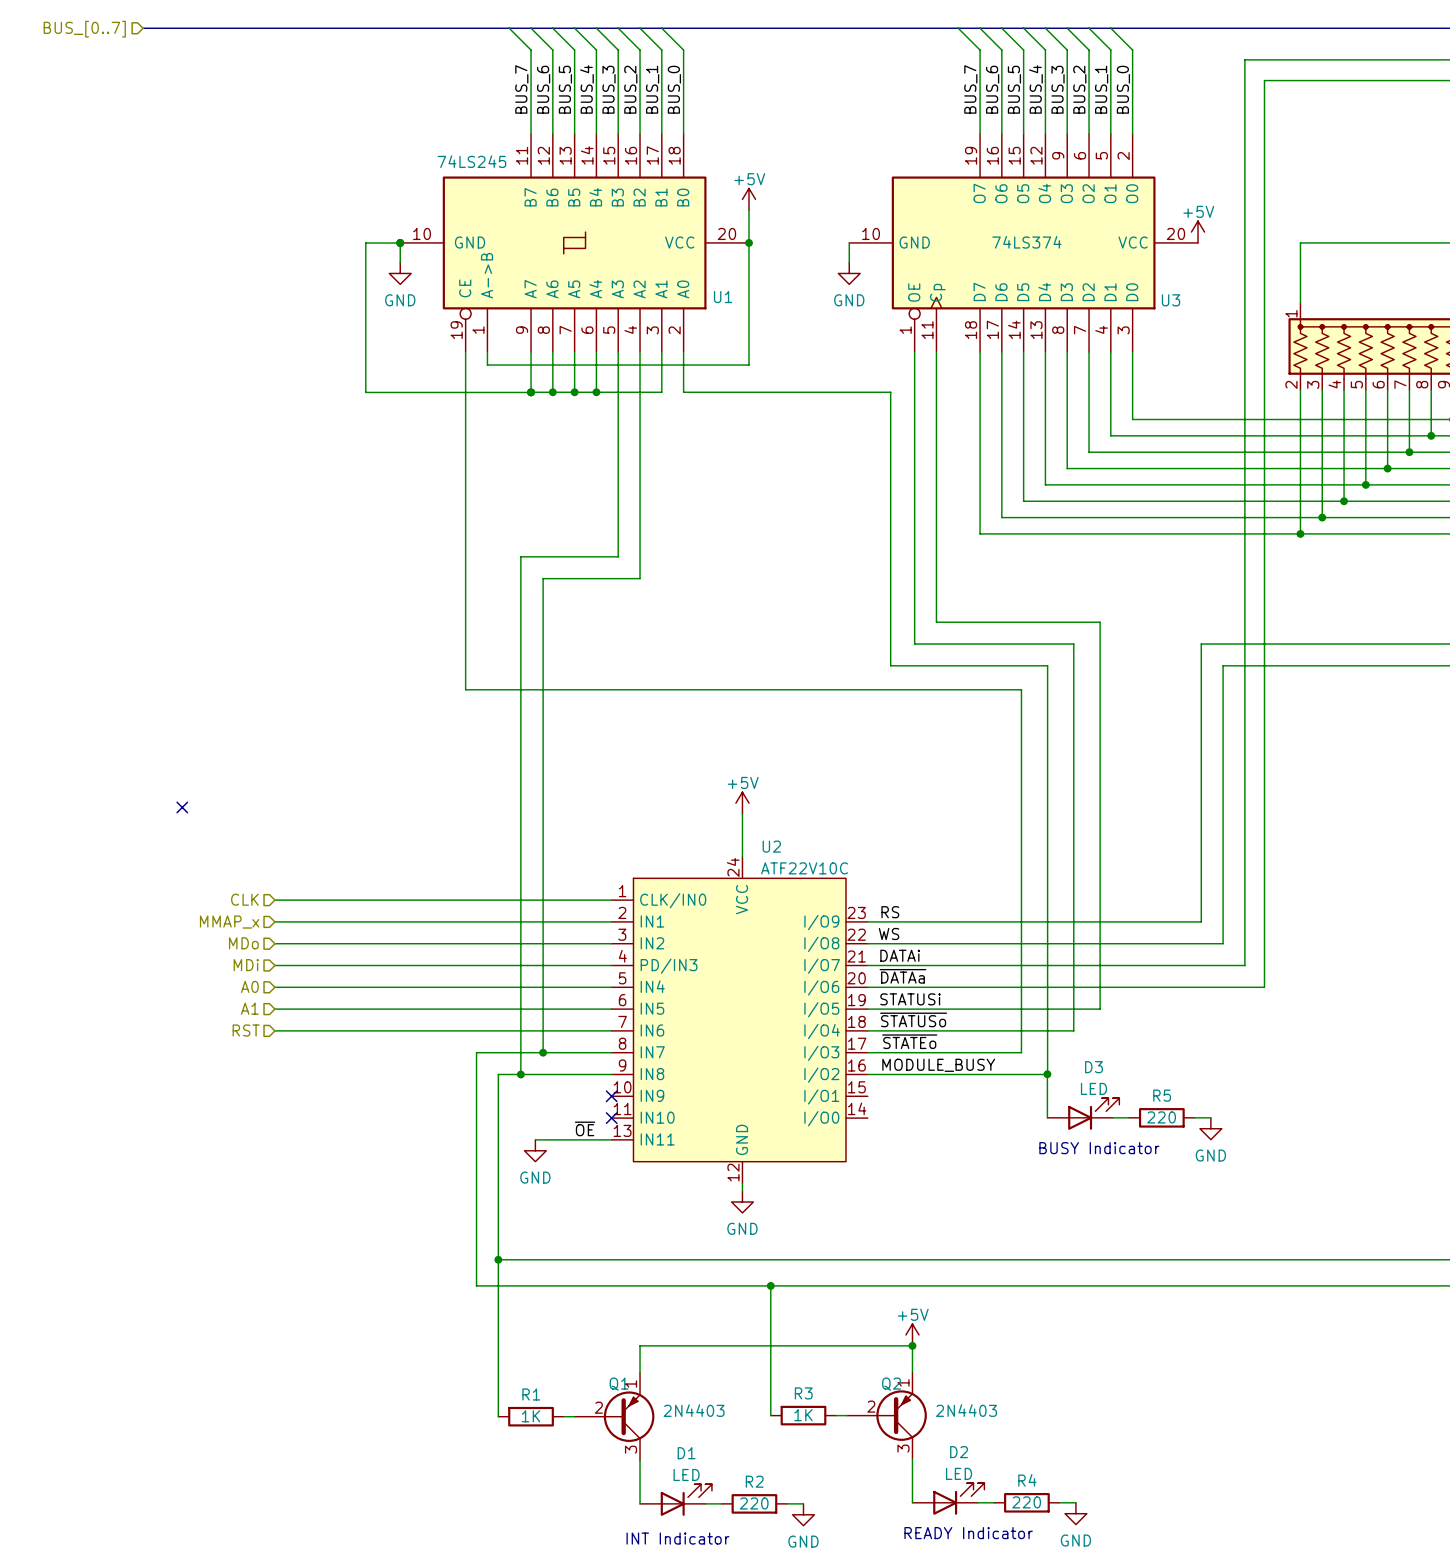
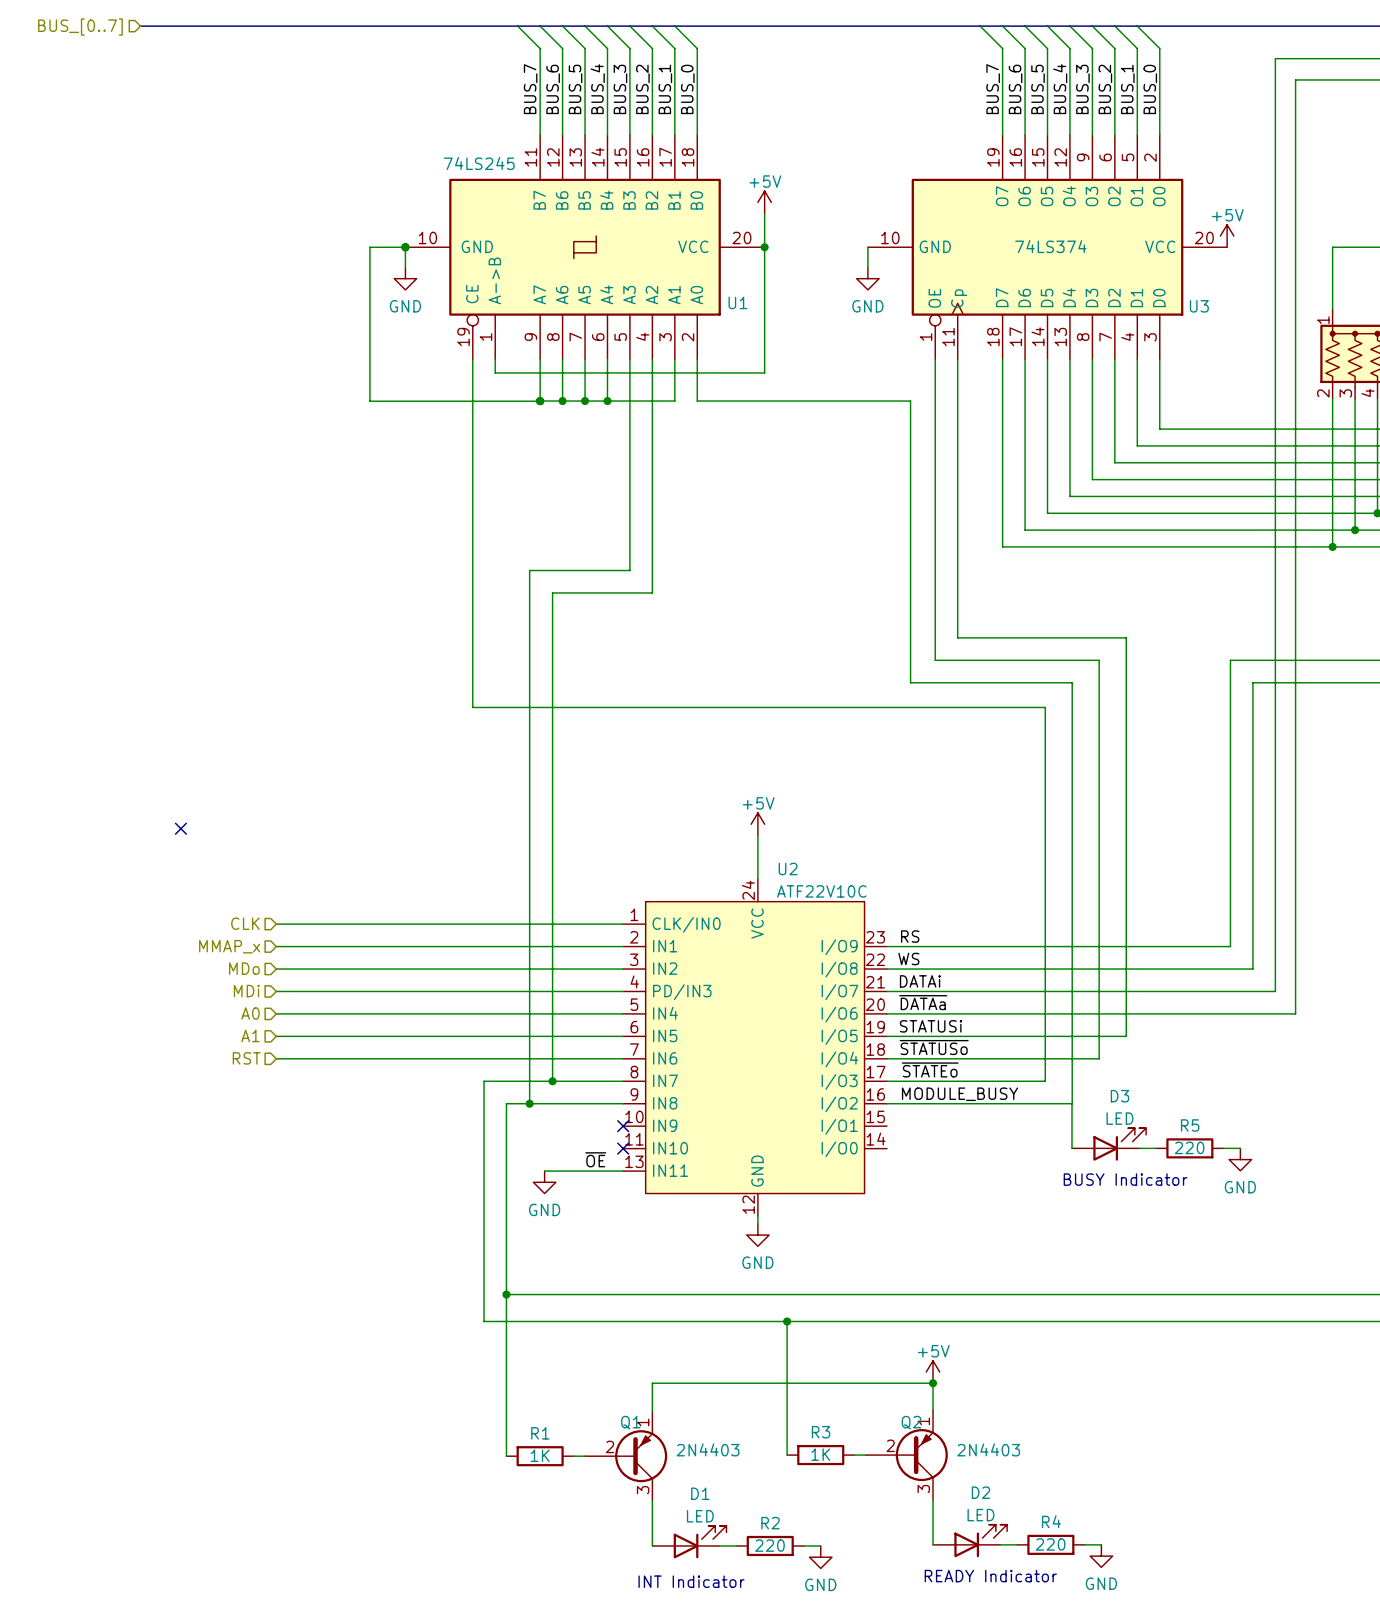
junction: (1047, 1074) -> none

